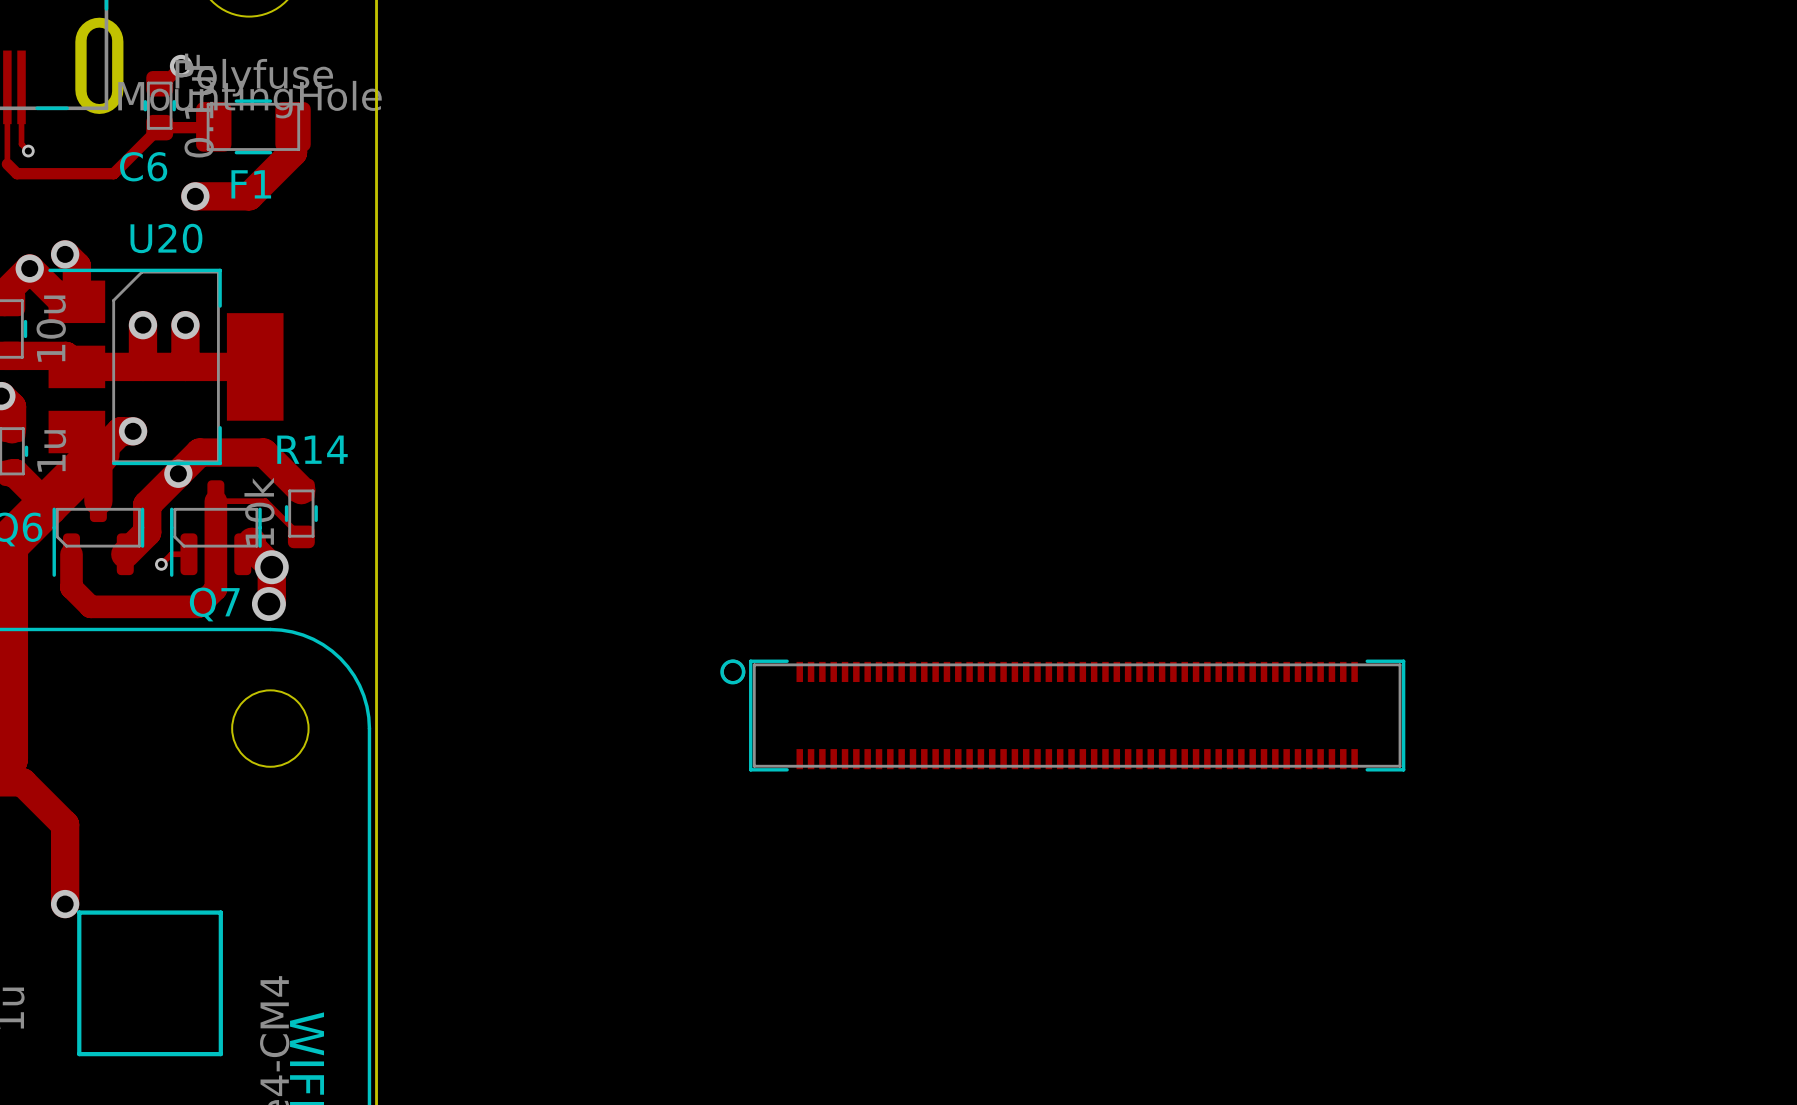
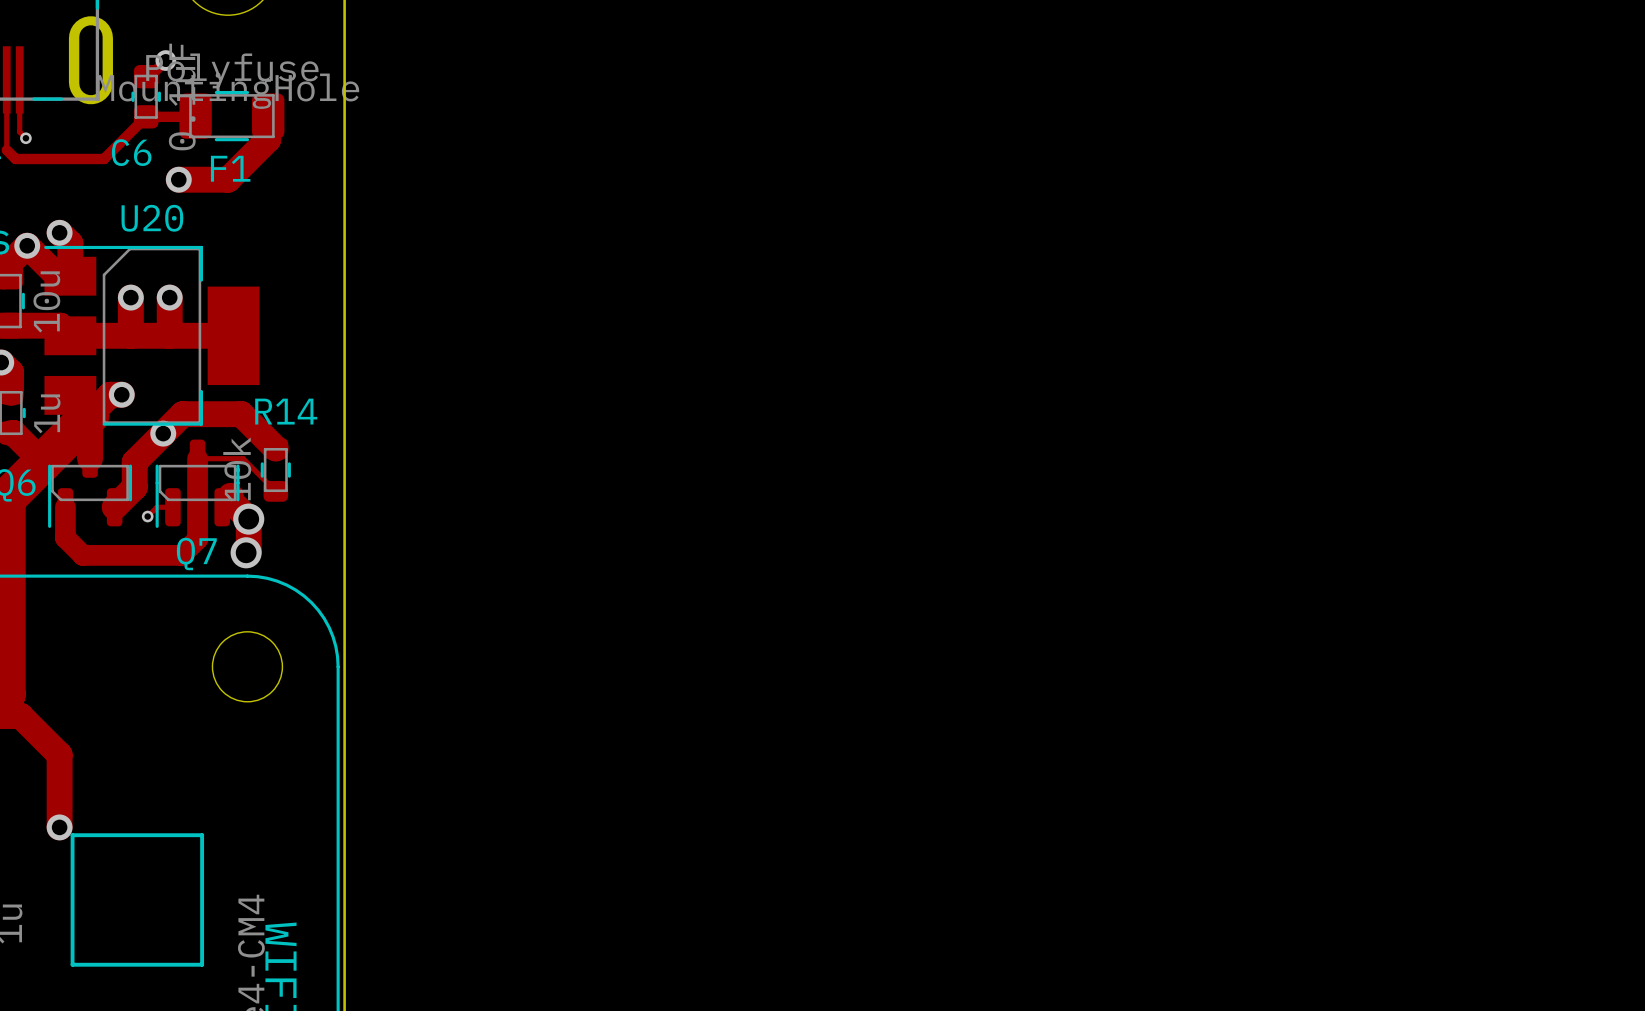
part: (1062, 715) -> none

